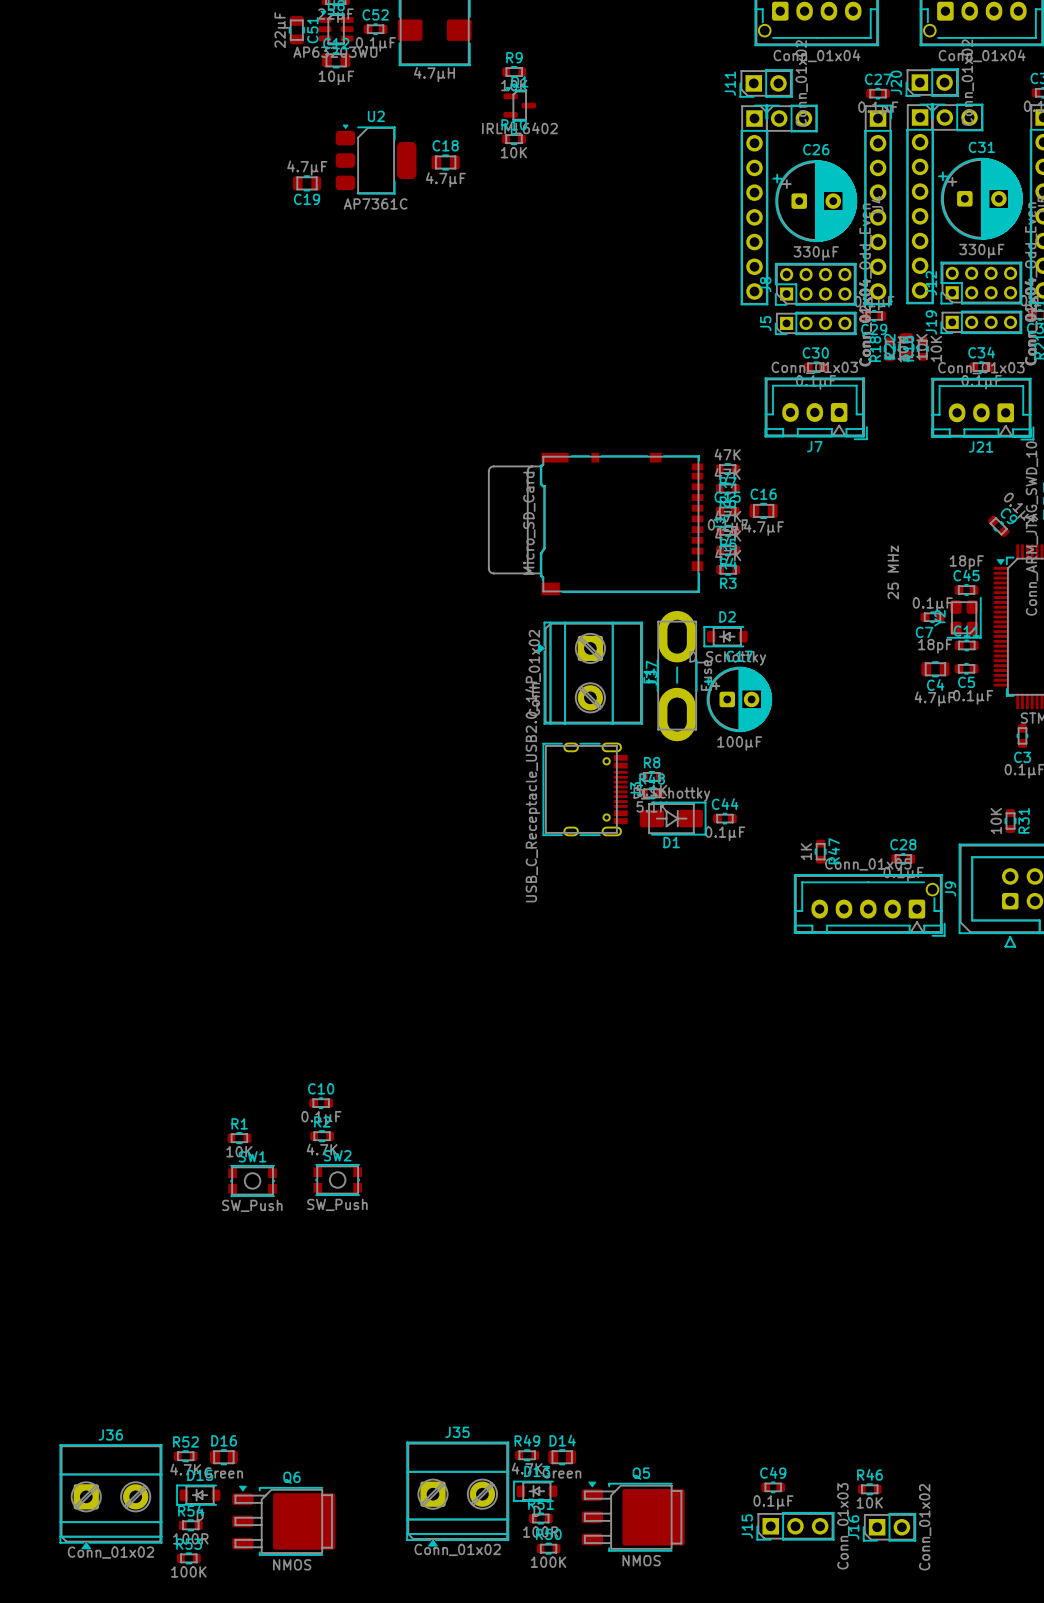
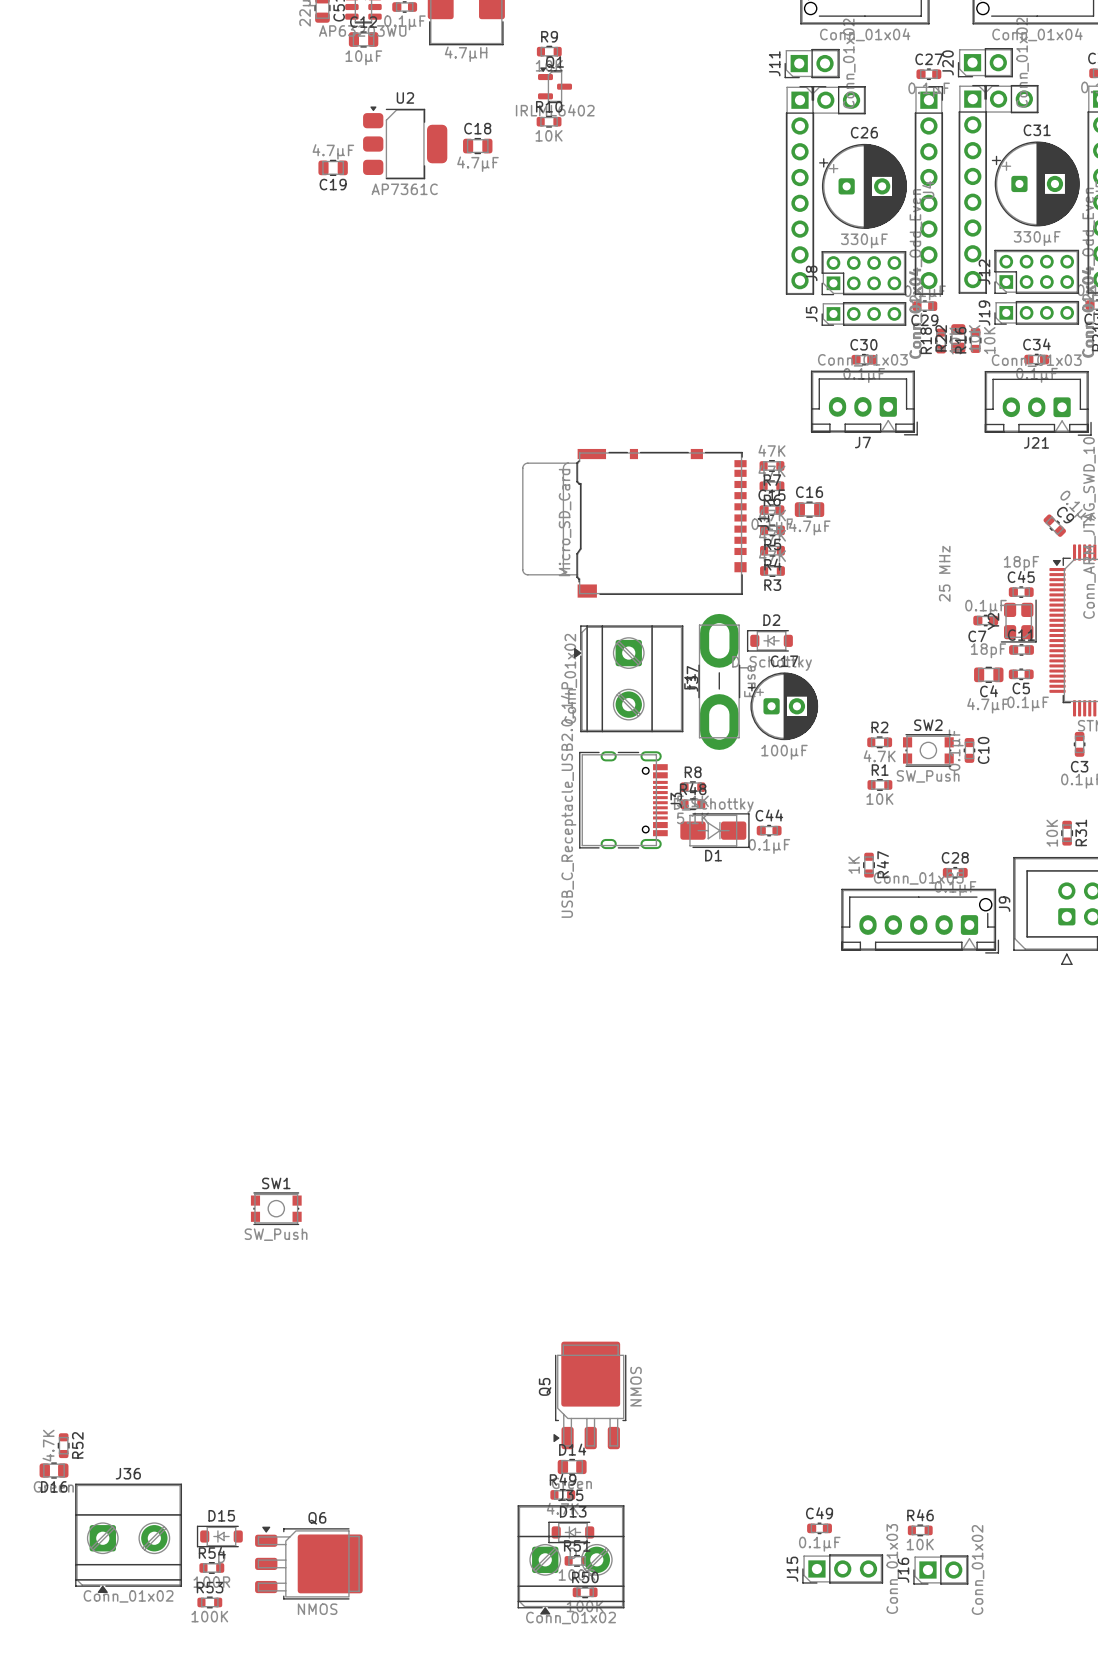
C10 rotation: 0° (321, 1103) -> 90° clockwise (969, 750)
C10 position: (321, 1103) -> (969, 750)
R2 position: (322, 1136) -> (879, 742)
R1 position: (239, 1138) -> (879, 784)
SW2 position: (337, 1179) -> (928, 750)
D16 name position: D16 (224, 1440) -> D16 (54, 1486)
R52 rotation: 0° (185, 1456) -> 90° clockwise (63, 1445)
R52 position: (185, 1456) -> (63, 1445)
D16 position: (223, 1457) -> (54, 1470)
D14 position: (562, 1457) -> (572, 1466)
J35 position: (457, 1494) -> (571, 1559)
Q5 rotation: 0° (633, 1516) -> 90° counterclockwise (589, 1395)
Q5 position: (633, 1516) -> (589, 1395)

